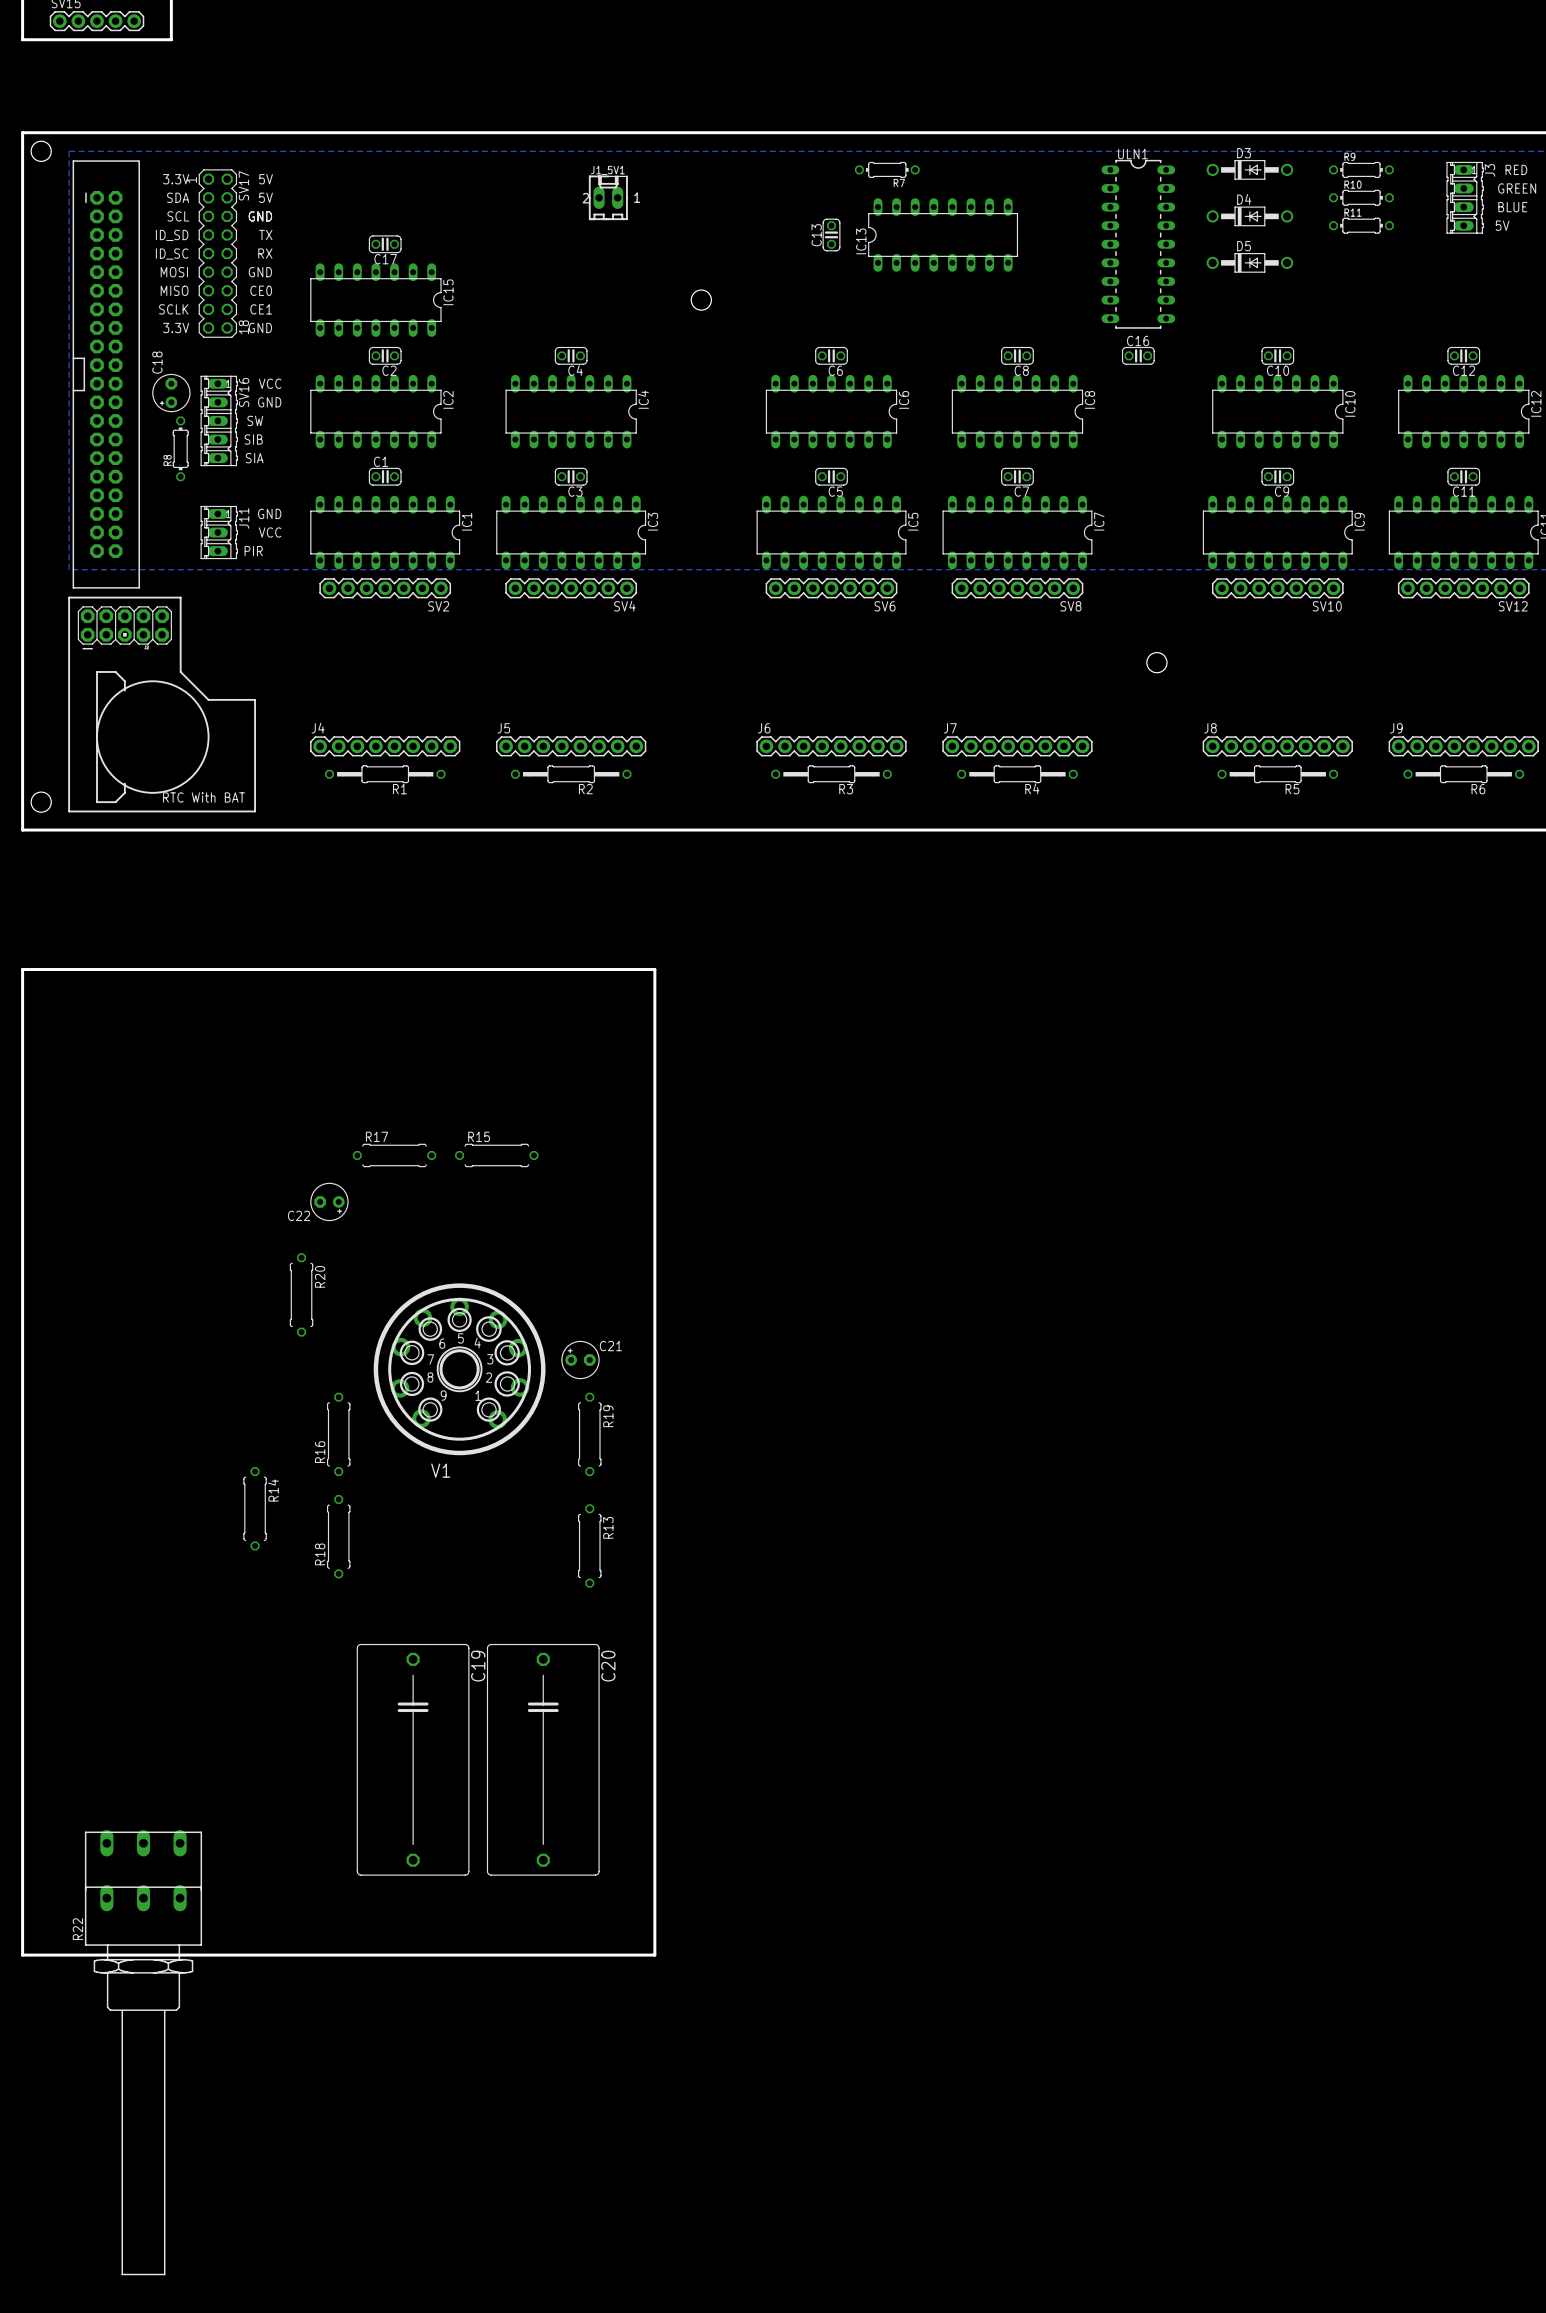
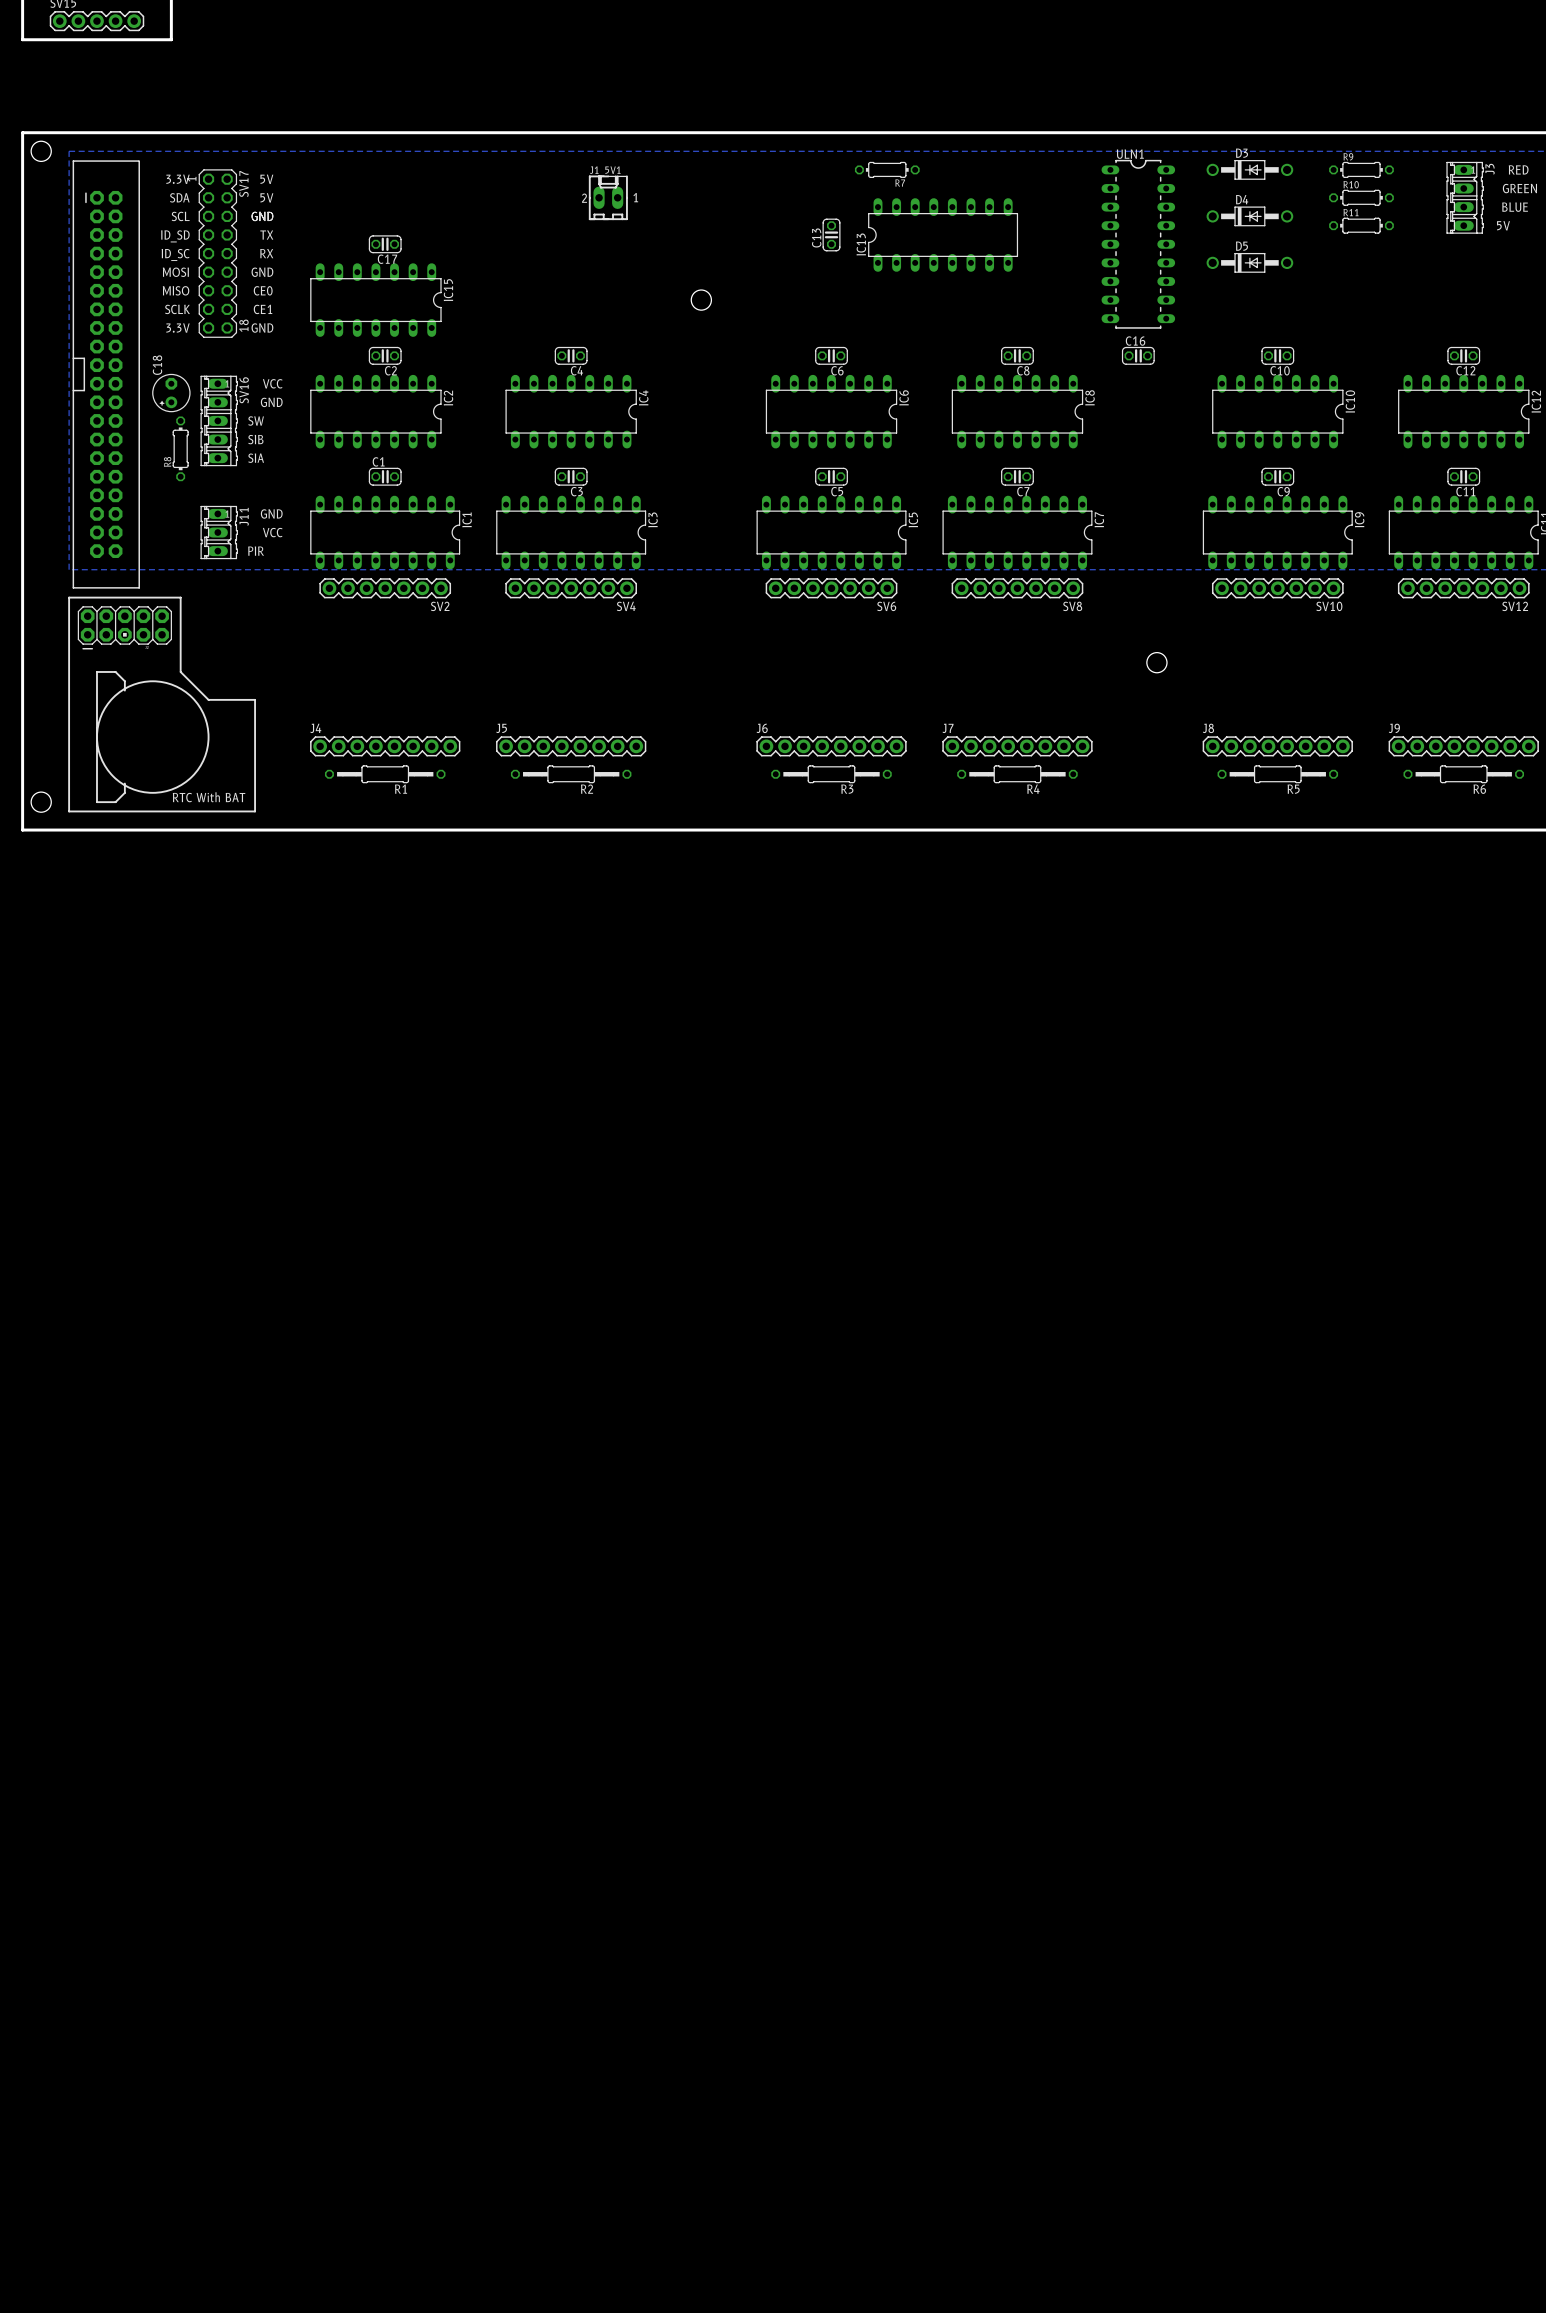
board edge: (22, 969) (654, 969) (654, 1955) (22, 1955) (22, 969) -> none
R17: (394, 1155) -> none
R15: (496, 1155) -> none
C22: (329, 1201) -> none
R20: (301, 1294) -> none
C21: (580, 1360) -> none
V1: (459, 1369) -> none
R16: (338, 1434) -> none
R19: (589, 1434) -> none
R14: (255, 1508) -> none
R18: (338, 1536) -> none
R13: (589, 1545) -> none
C19: (413, 1759) -> none
C20: (543, 1759) -> none
R22: (143, 2052) -> none

